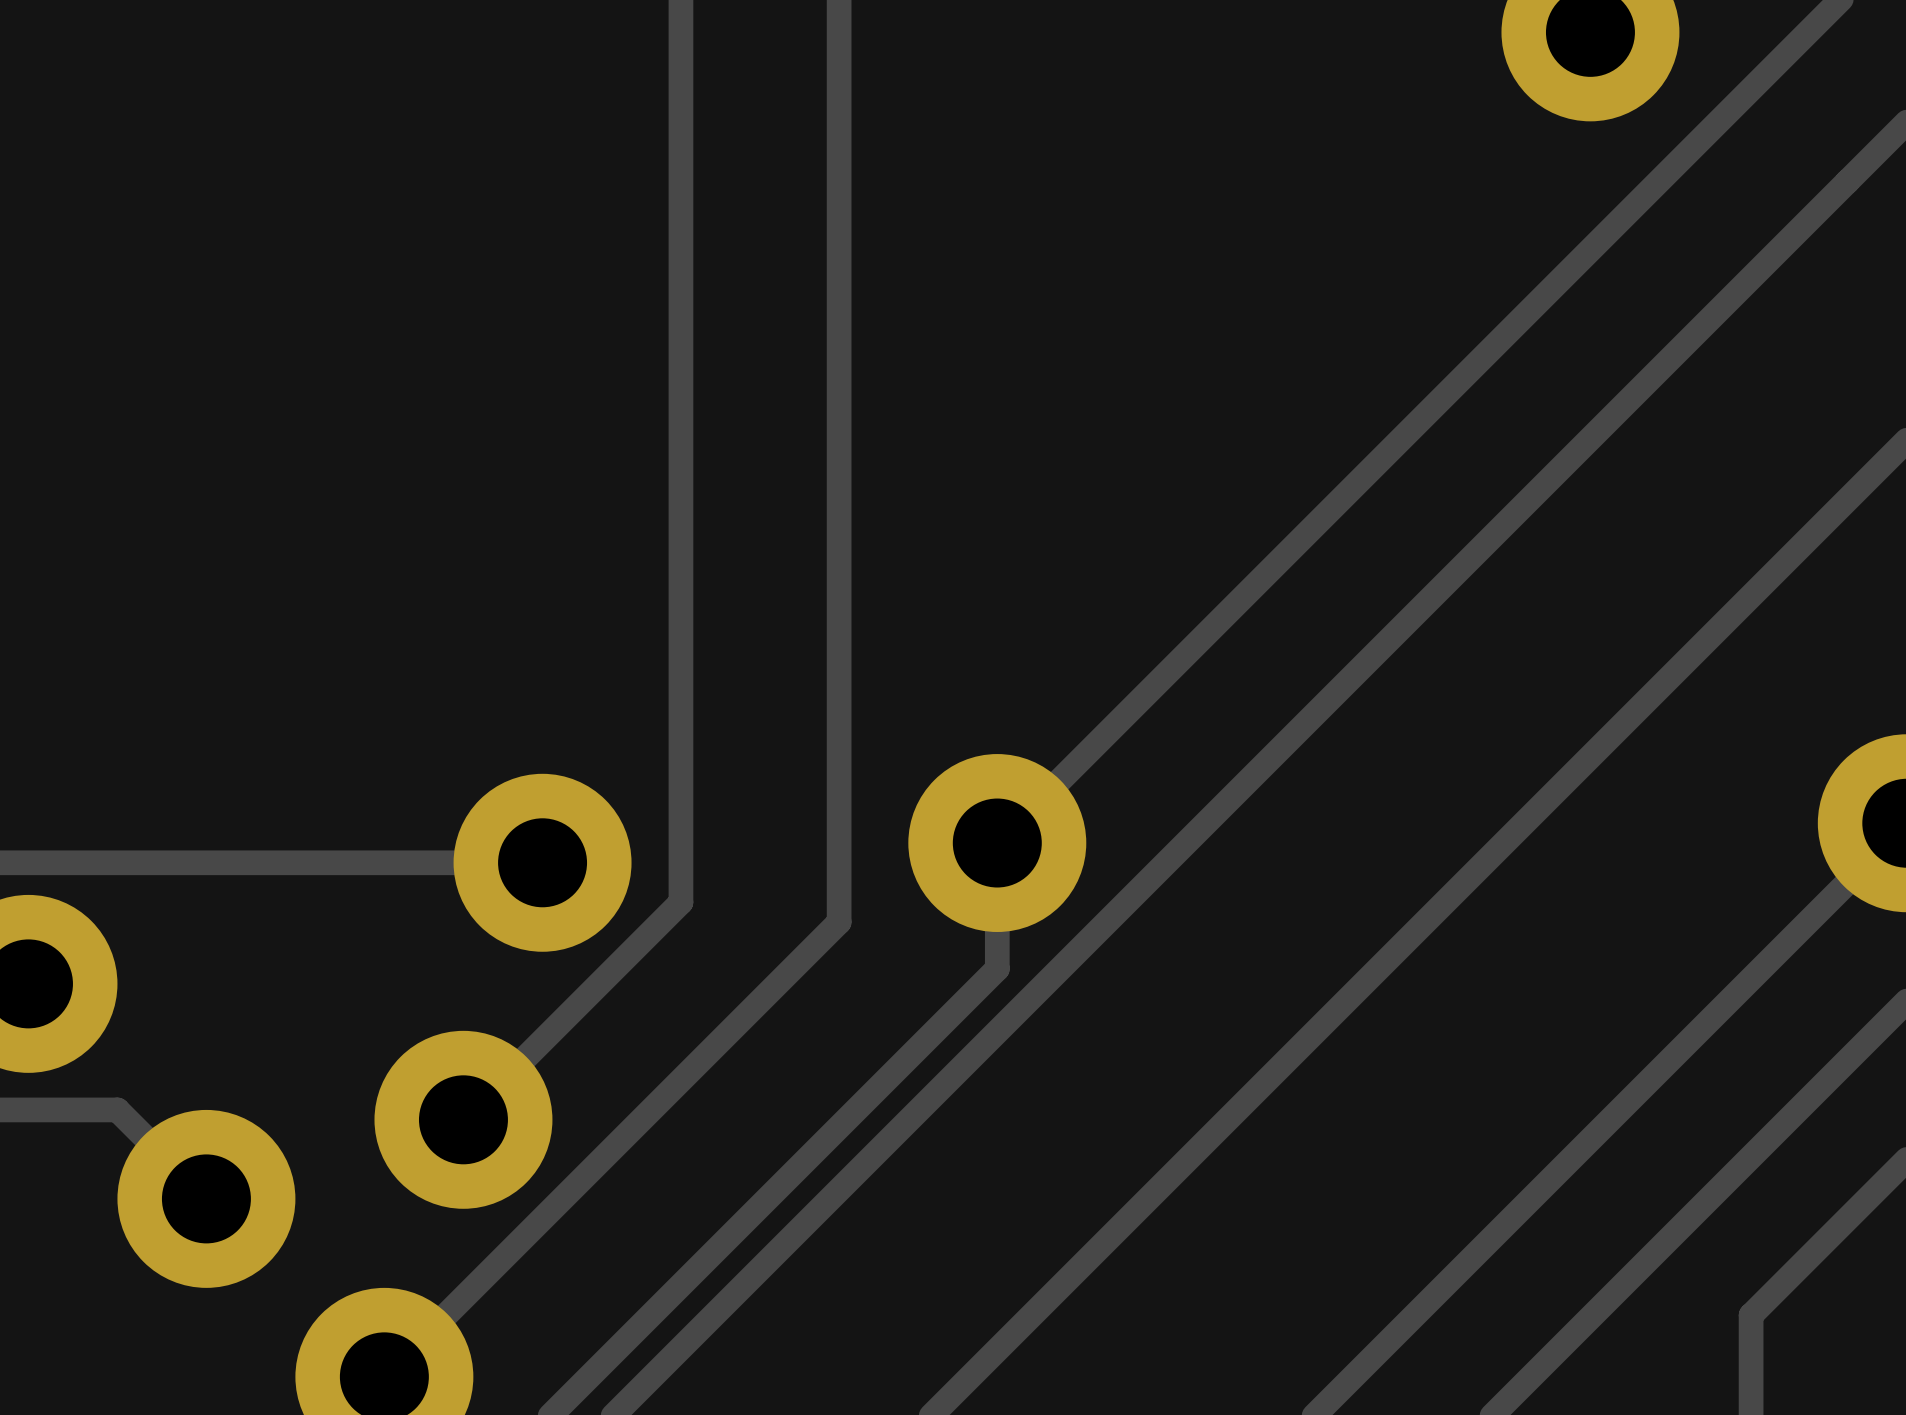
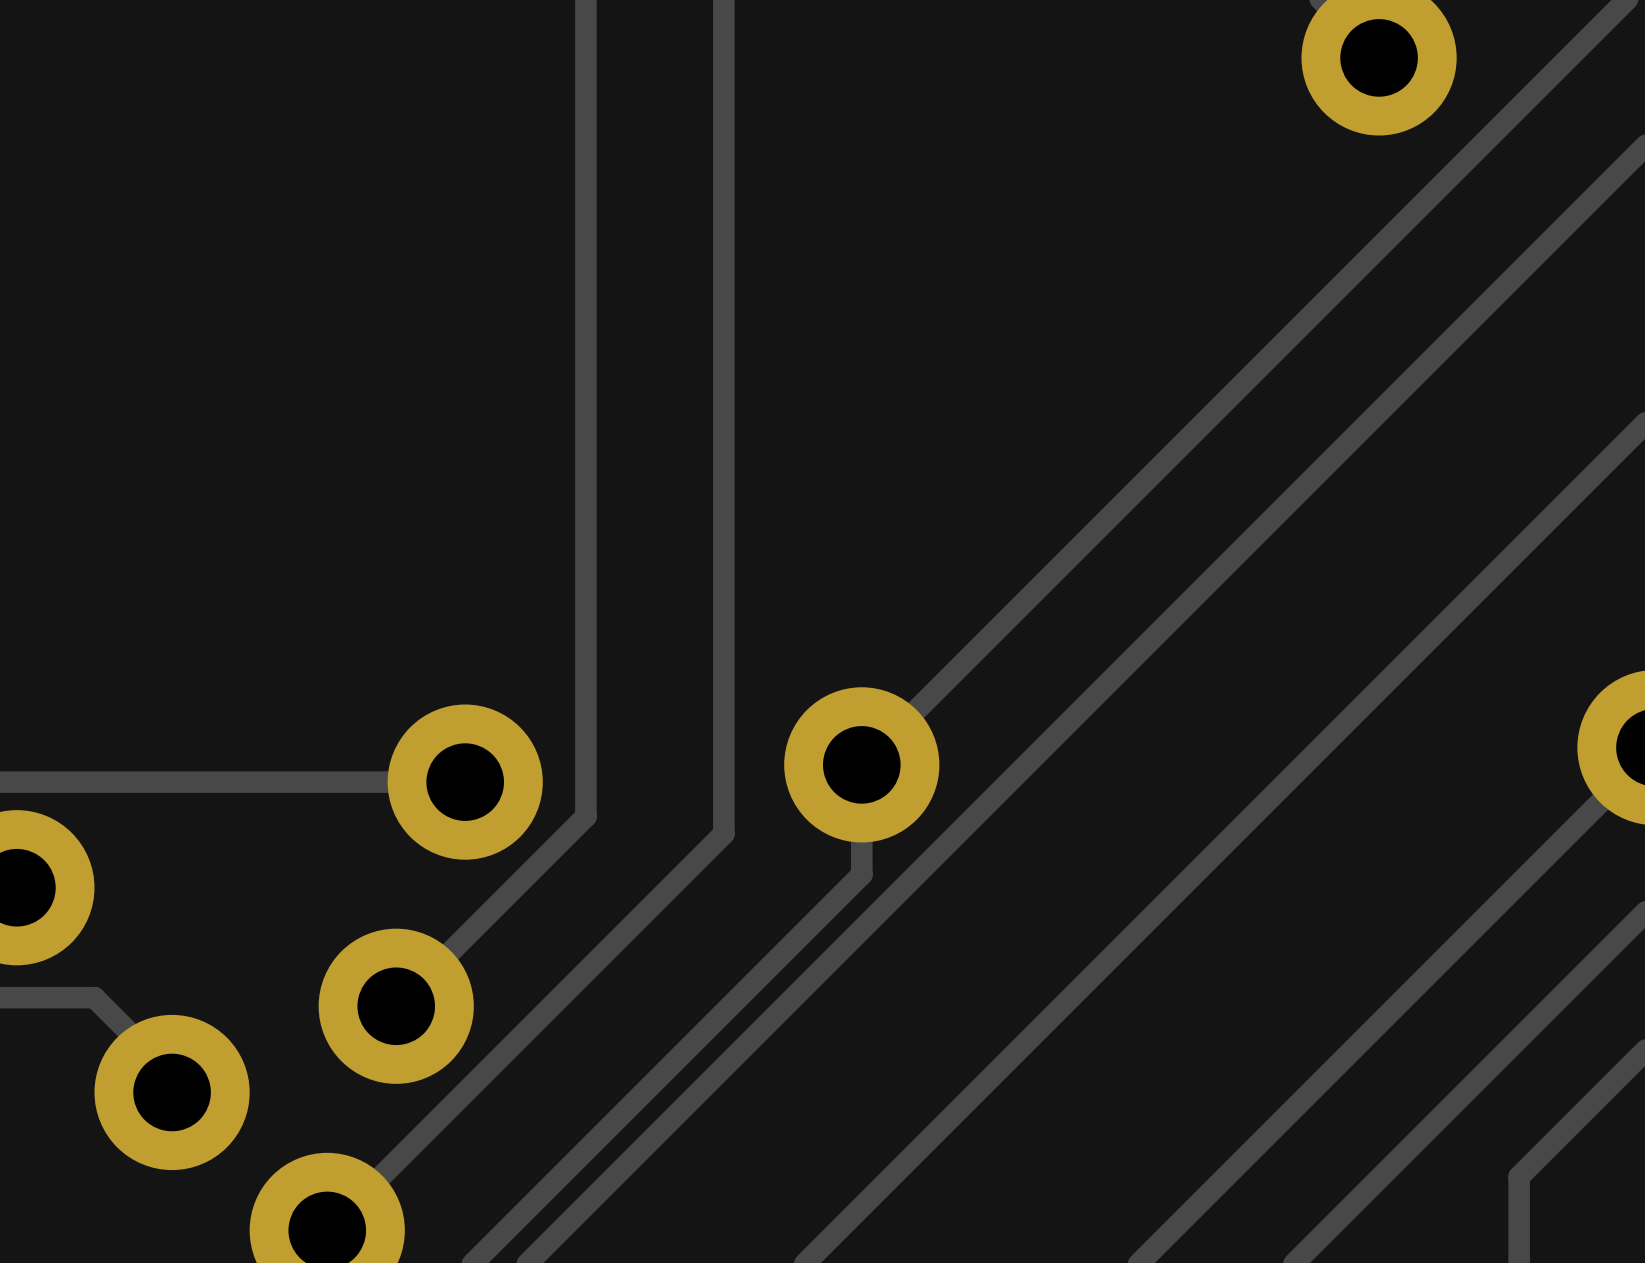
via position: (206, 1198) -> (172, 1092)

